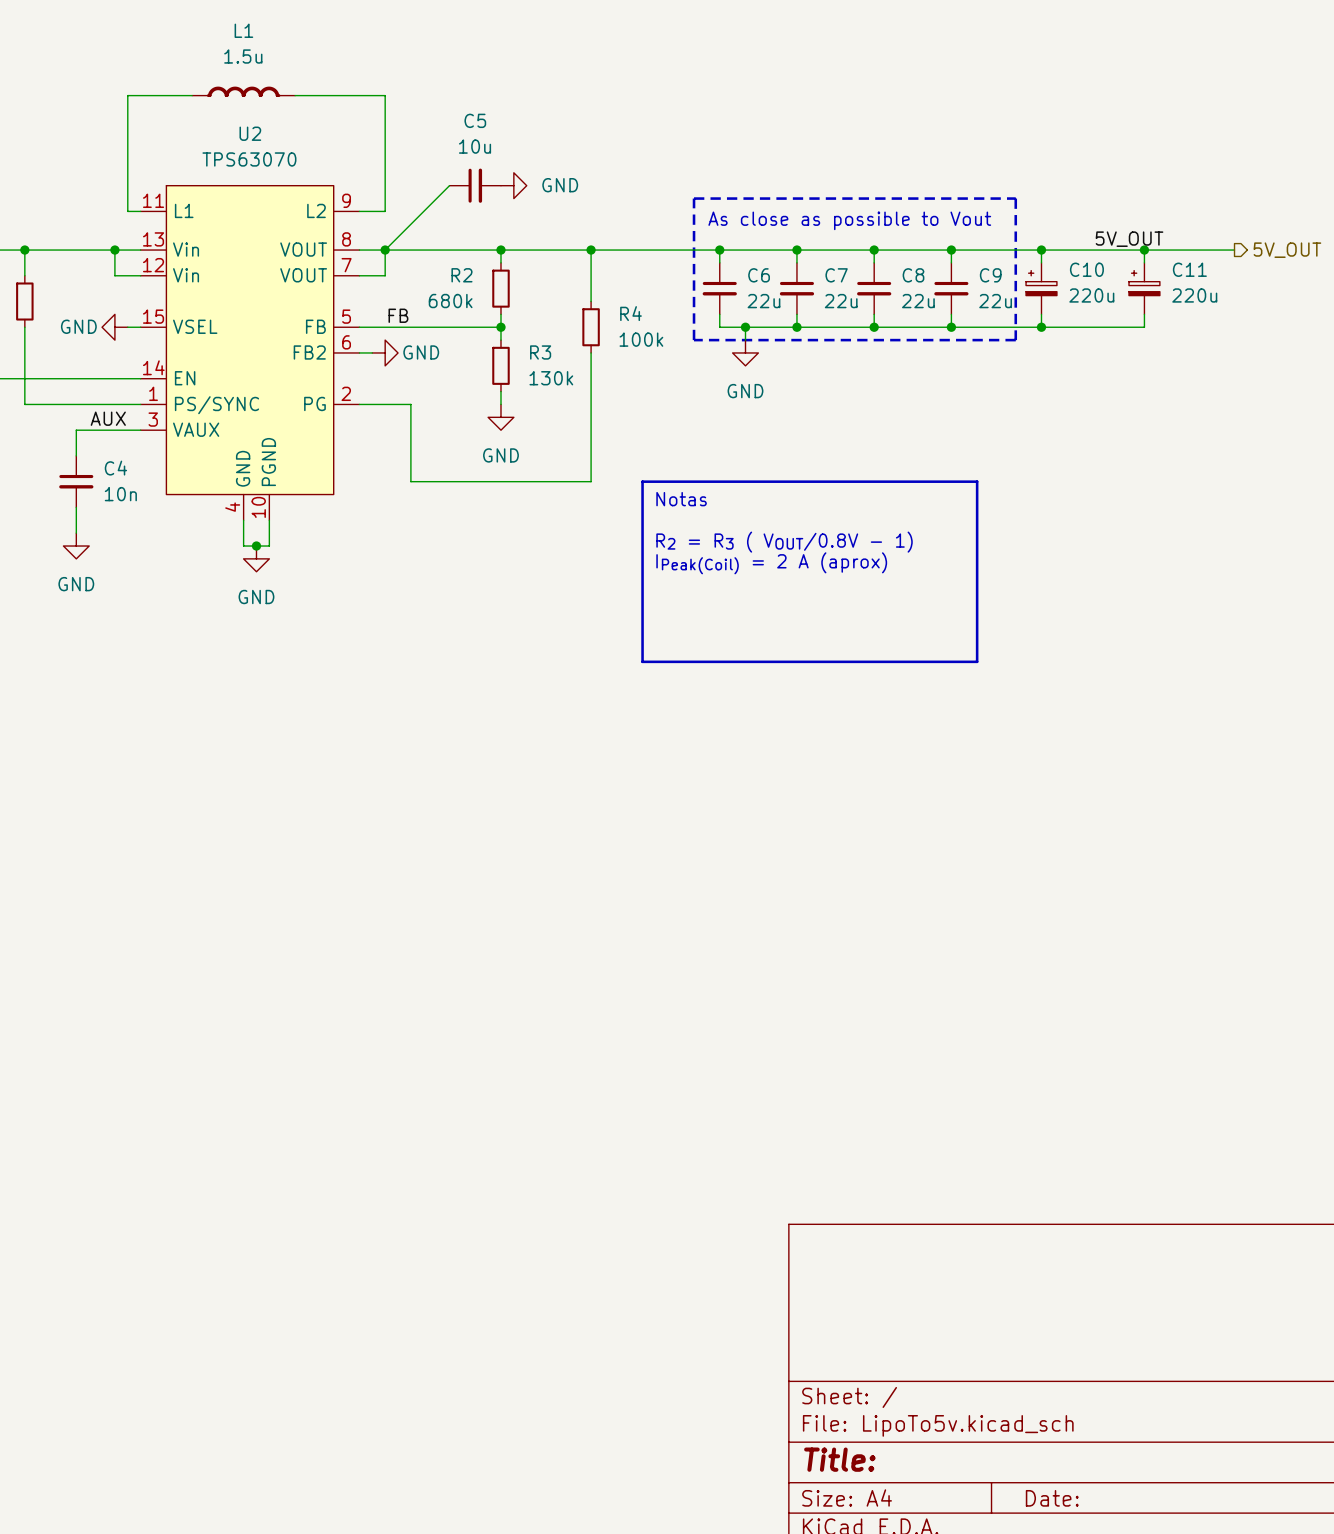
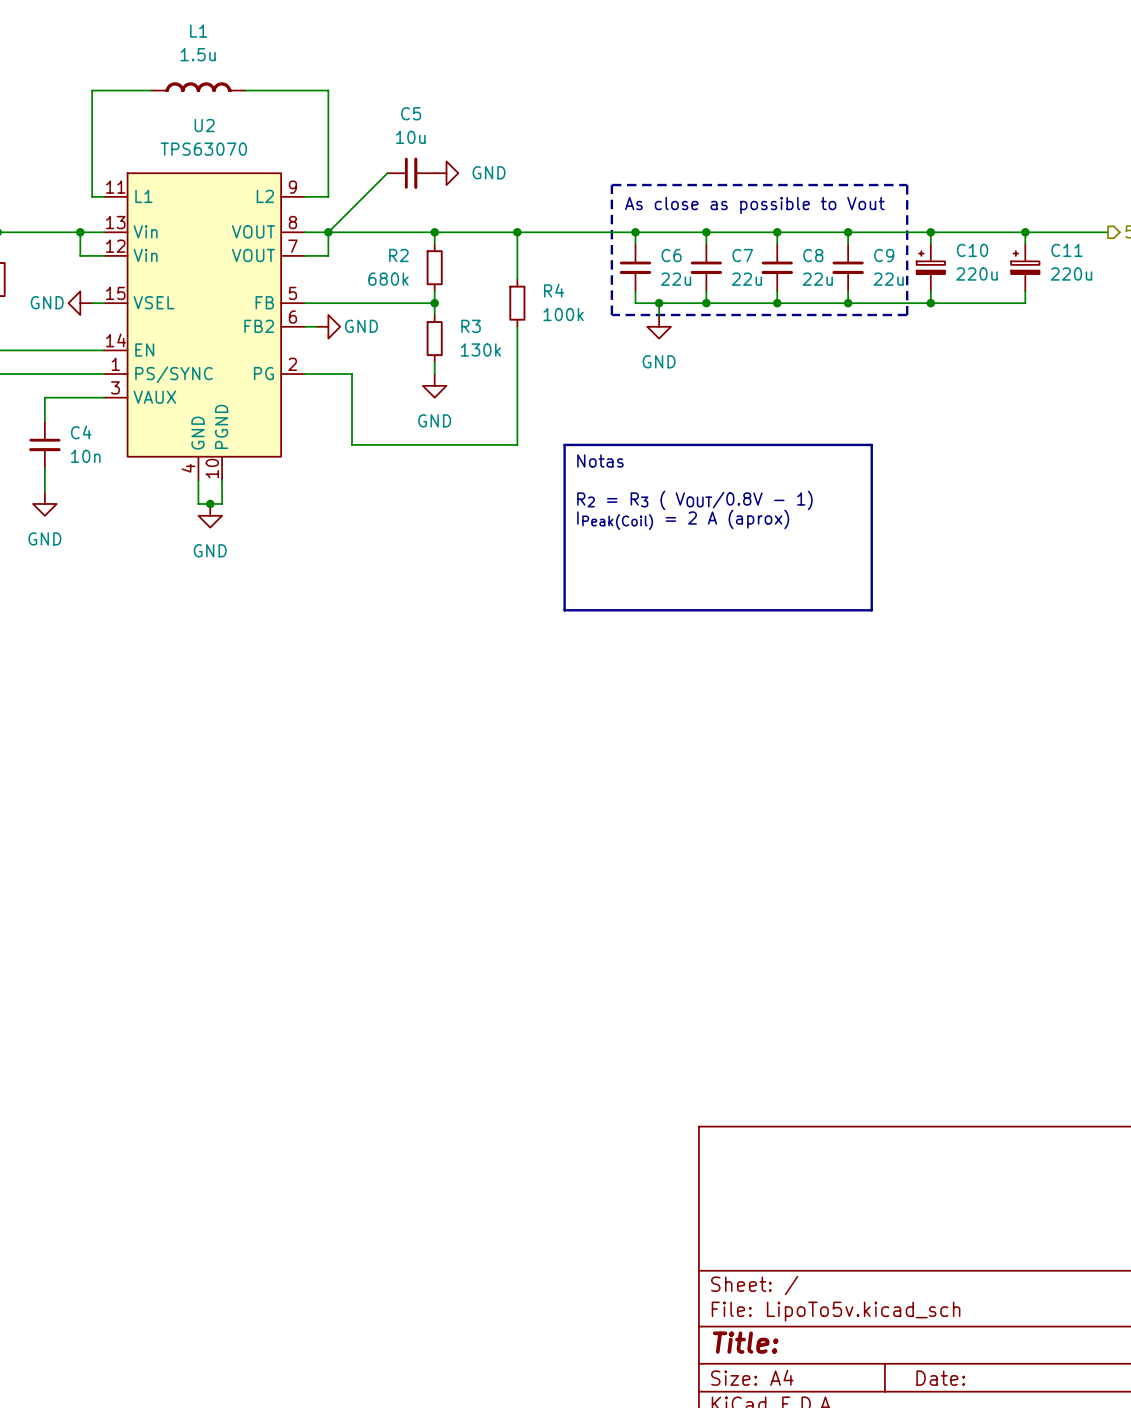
label: 5V_OUT (1129, 239) -> none
label: FB (398, 315) -> none
label: AUX (108, 418) -> none

